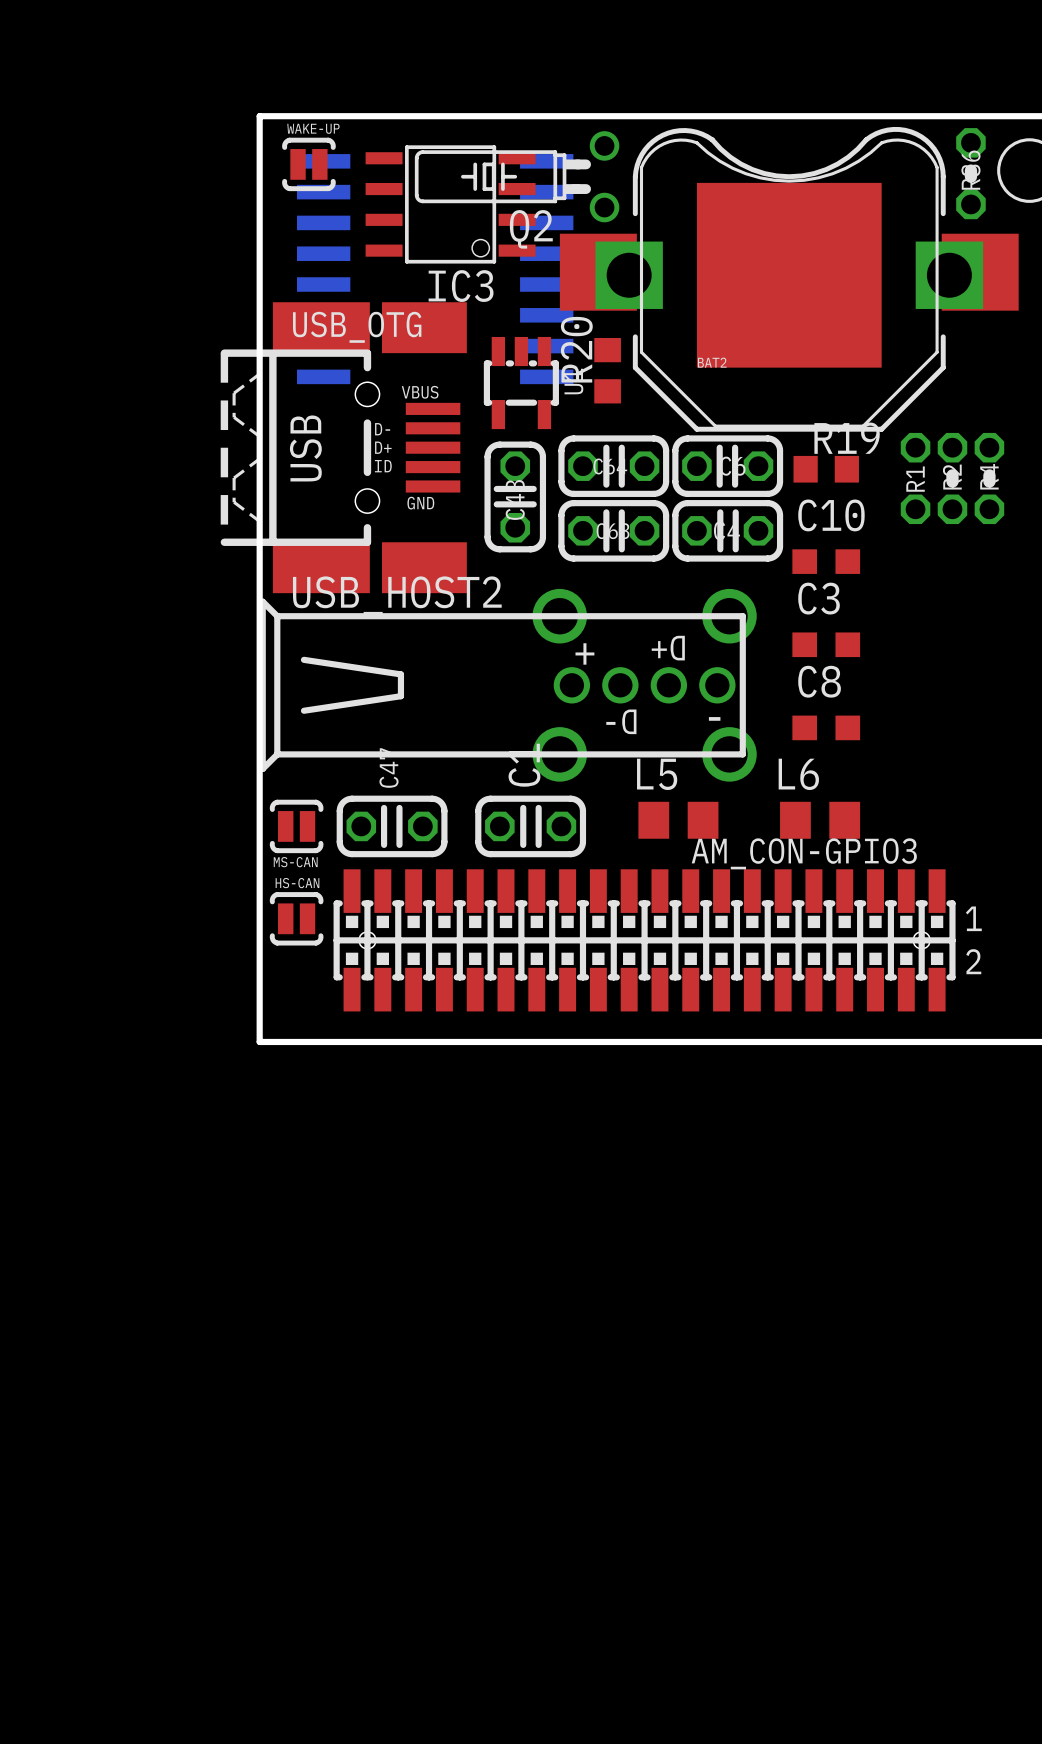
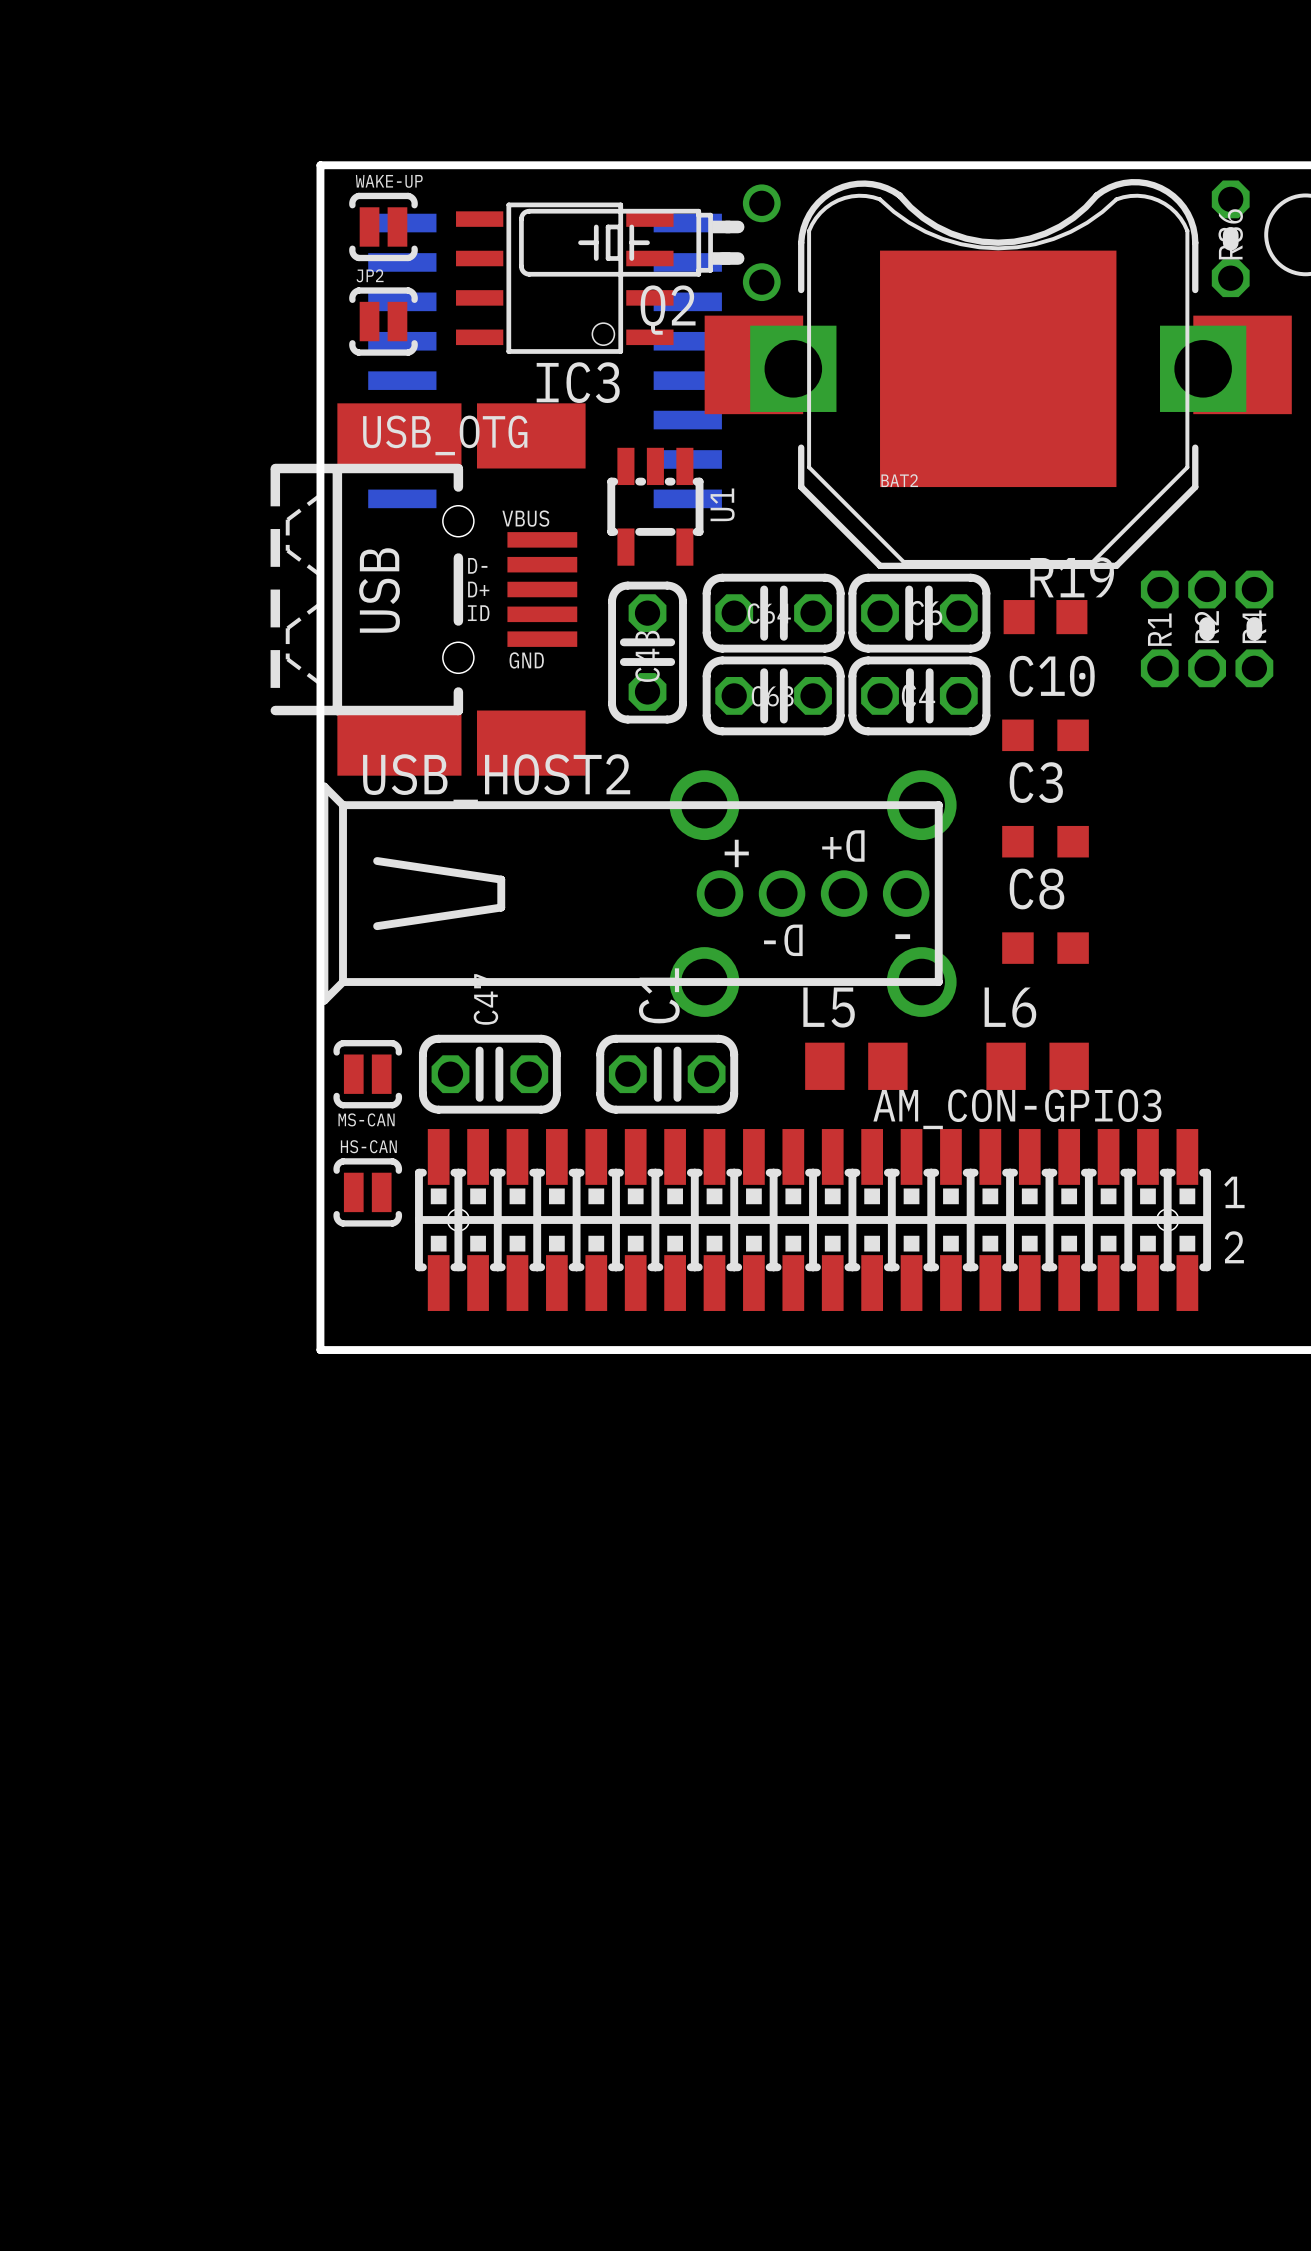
JP2: none -> (383, 321)
R20: (607, 370) -> none

